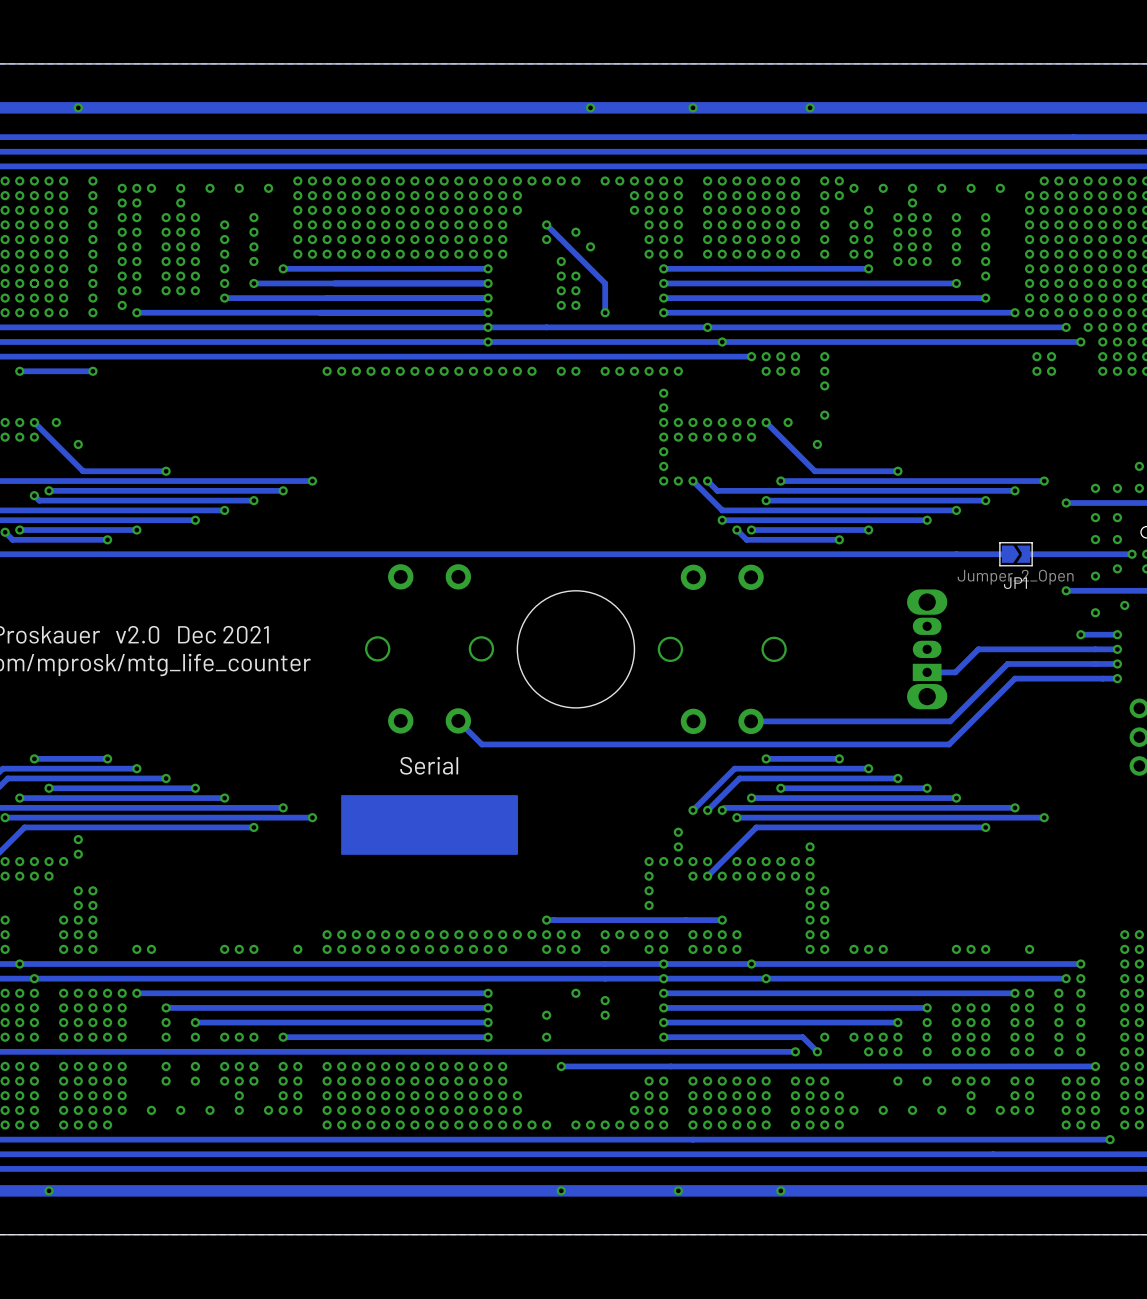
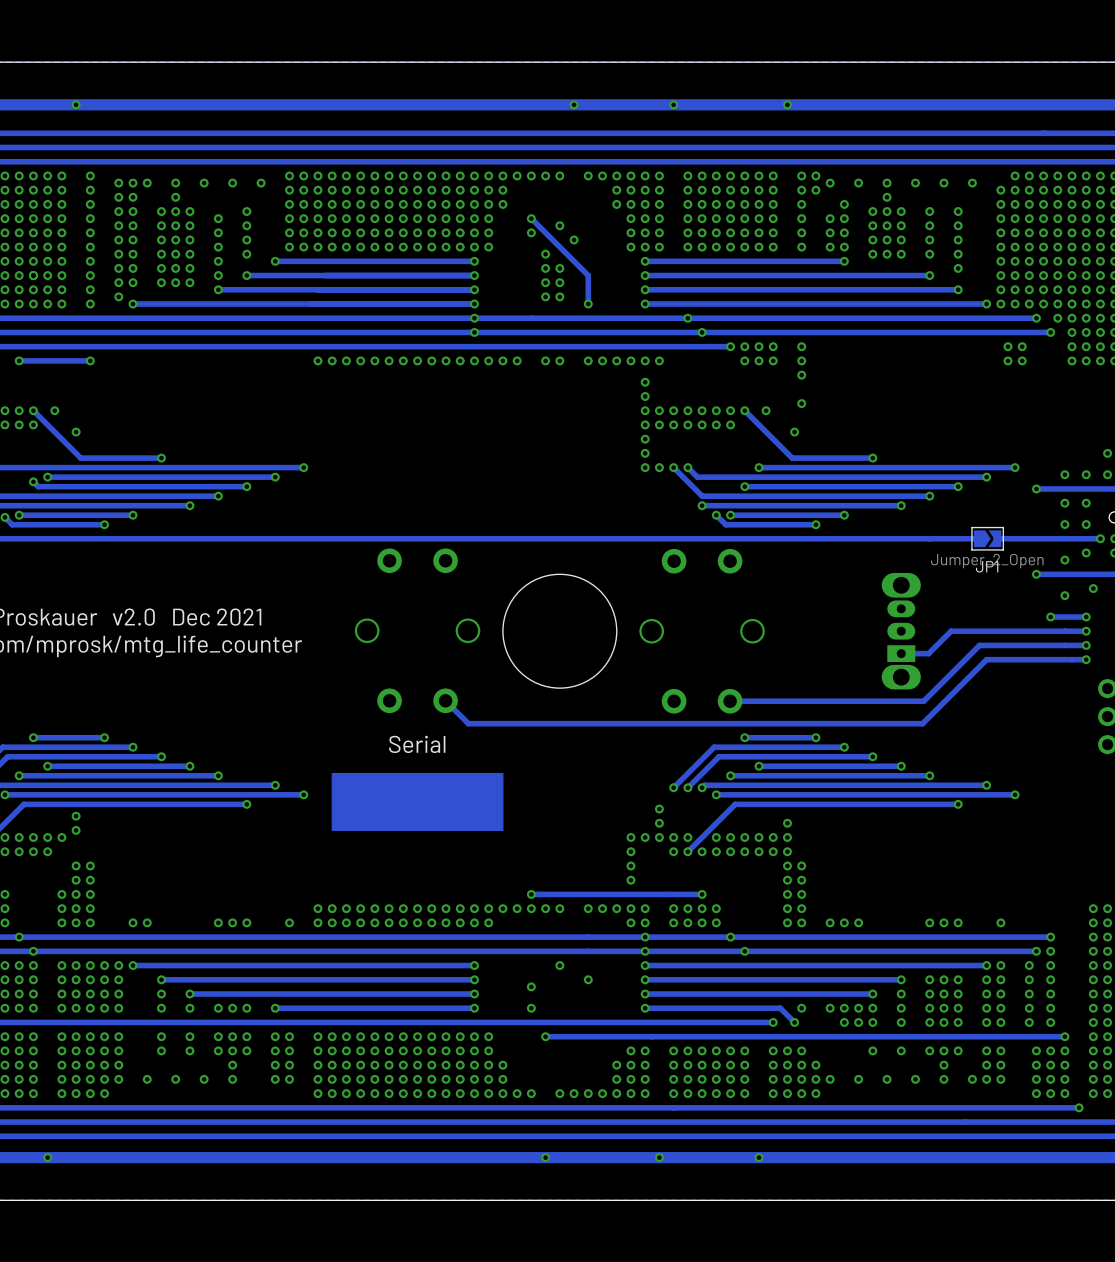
via: (546, 949) -> none
via: (561, 949) -> none
via: (575, 949) -> none
via: (605, 949) -> none
via: (605, 1000) -> none
via: none -> (588, 979)
via: (605, 1015) -> none
via: (268, 1110) -> none

